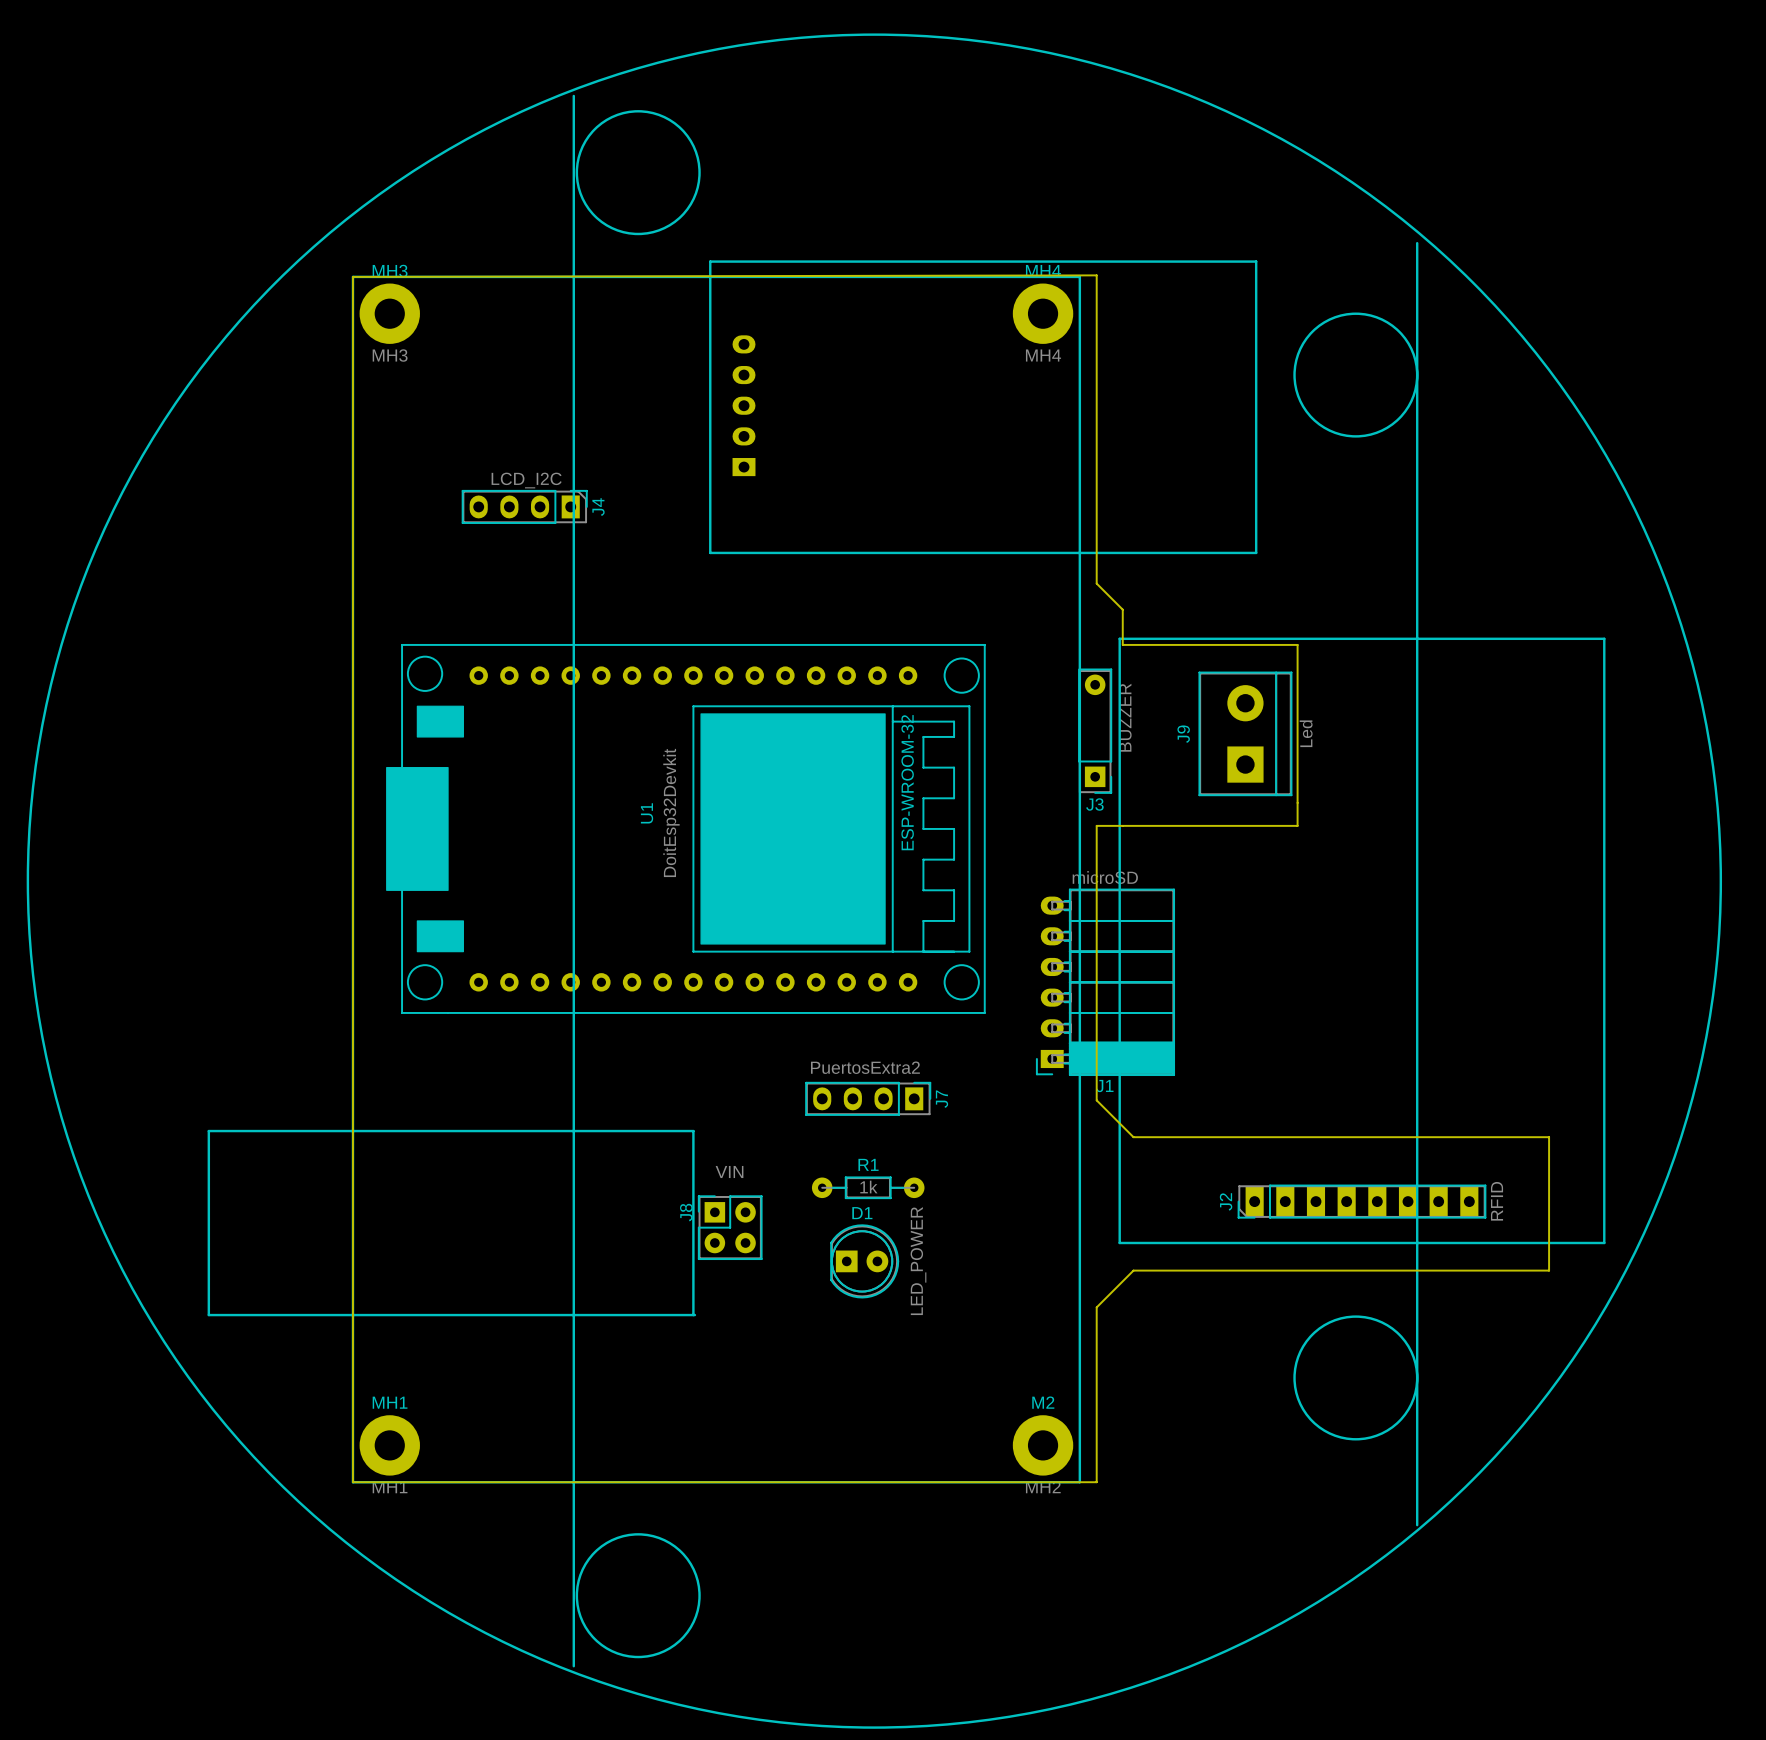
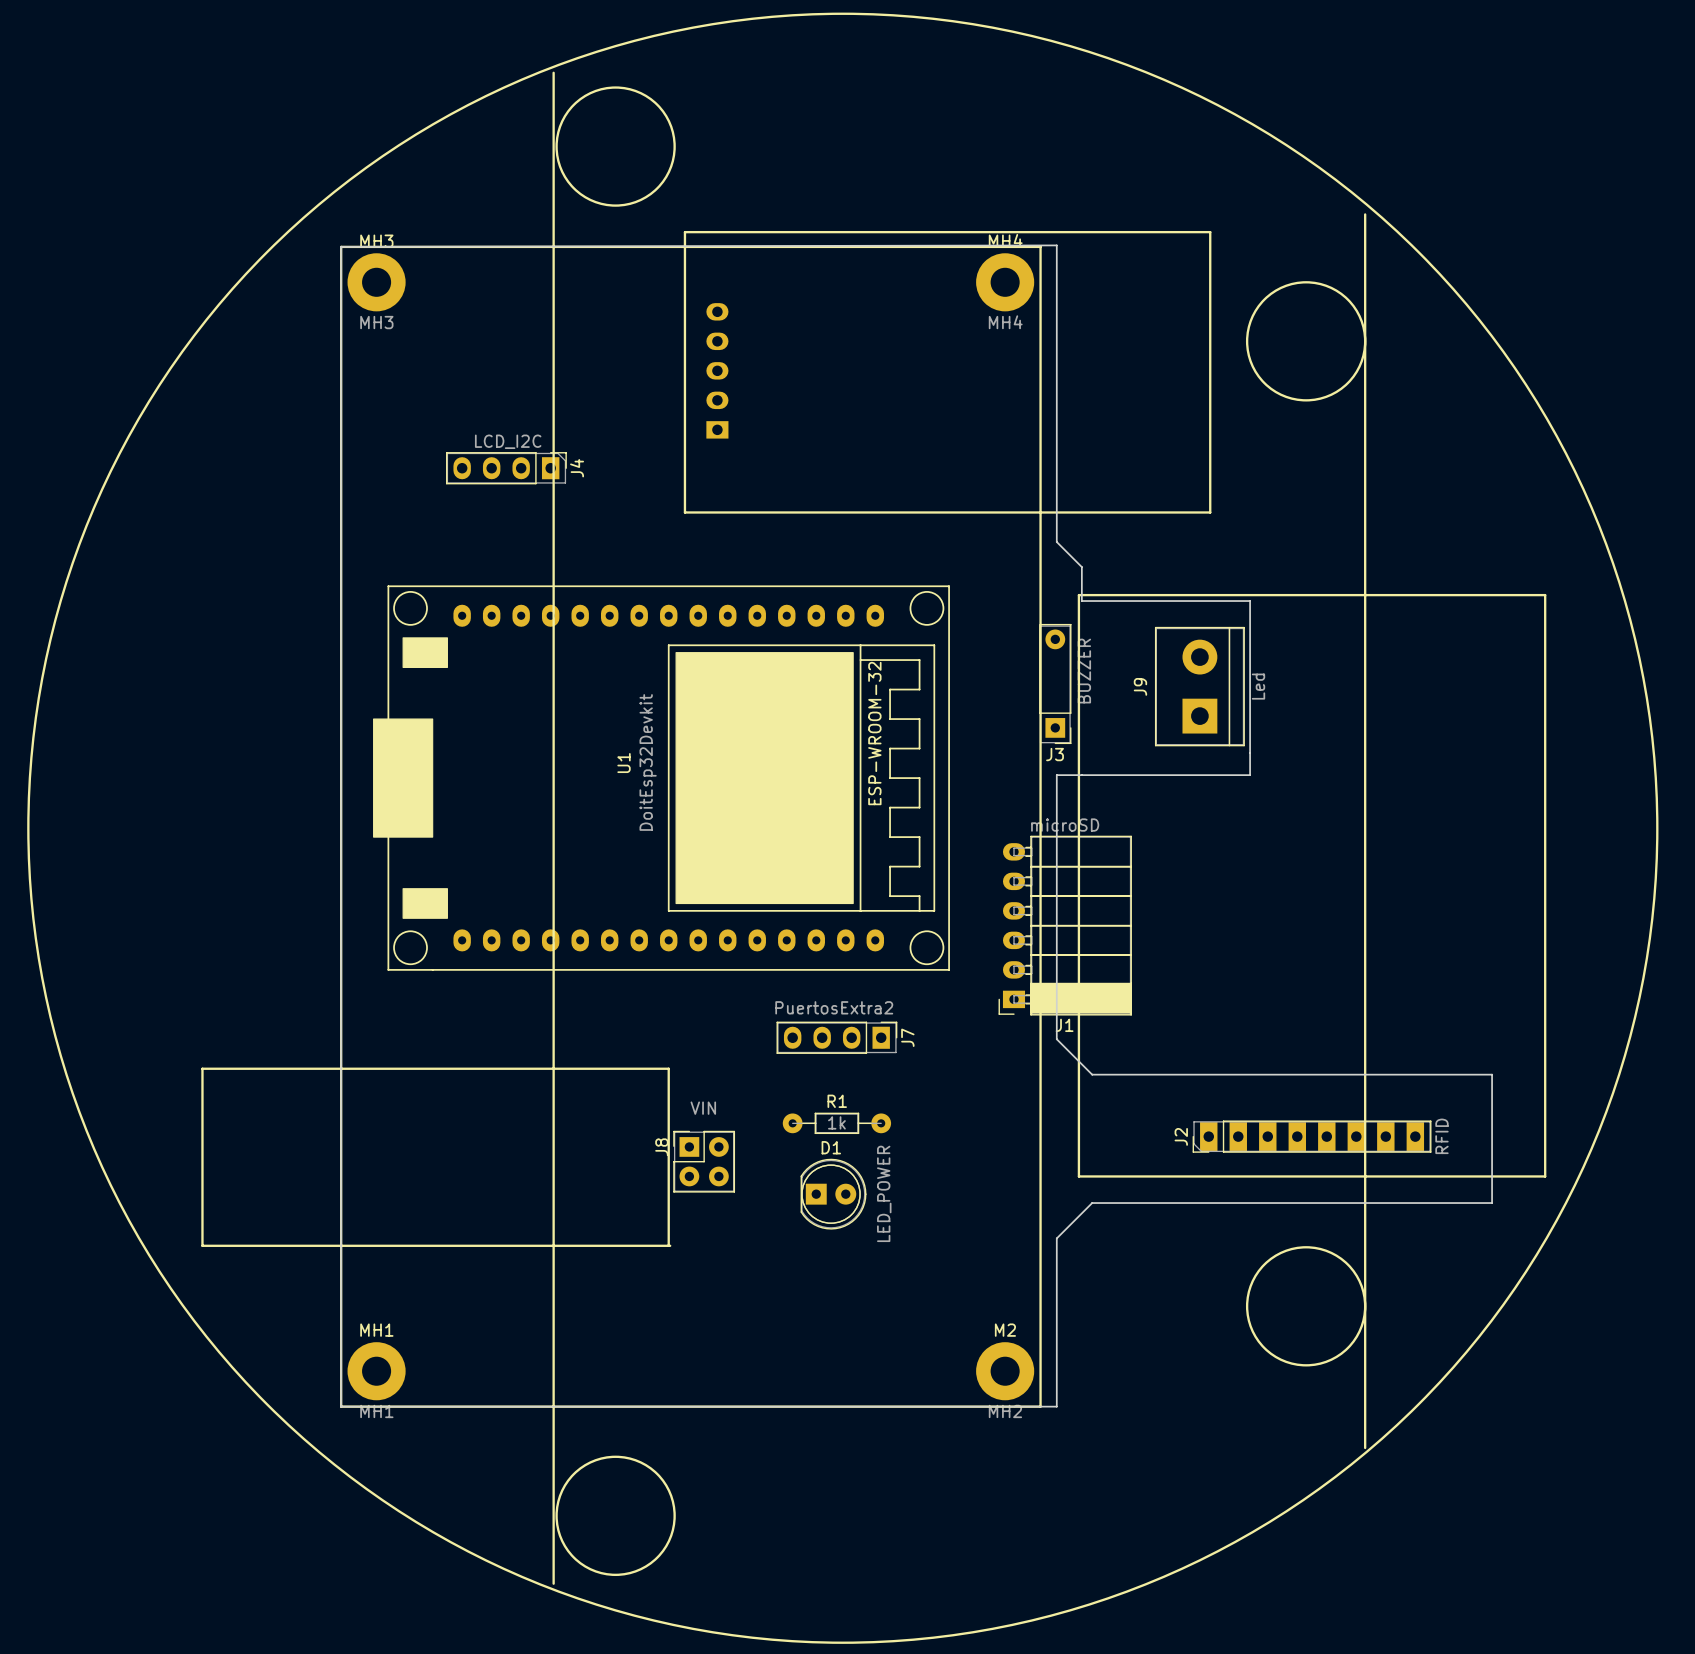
U1 footprint: [386, 644, 986, 1014] -> [373, 585, 950, 971]

